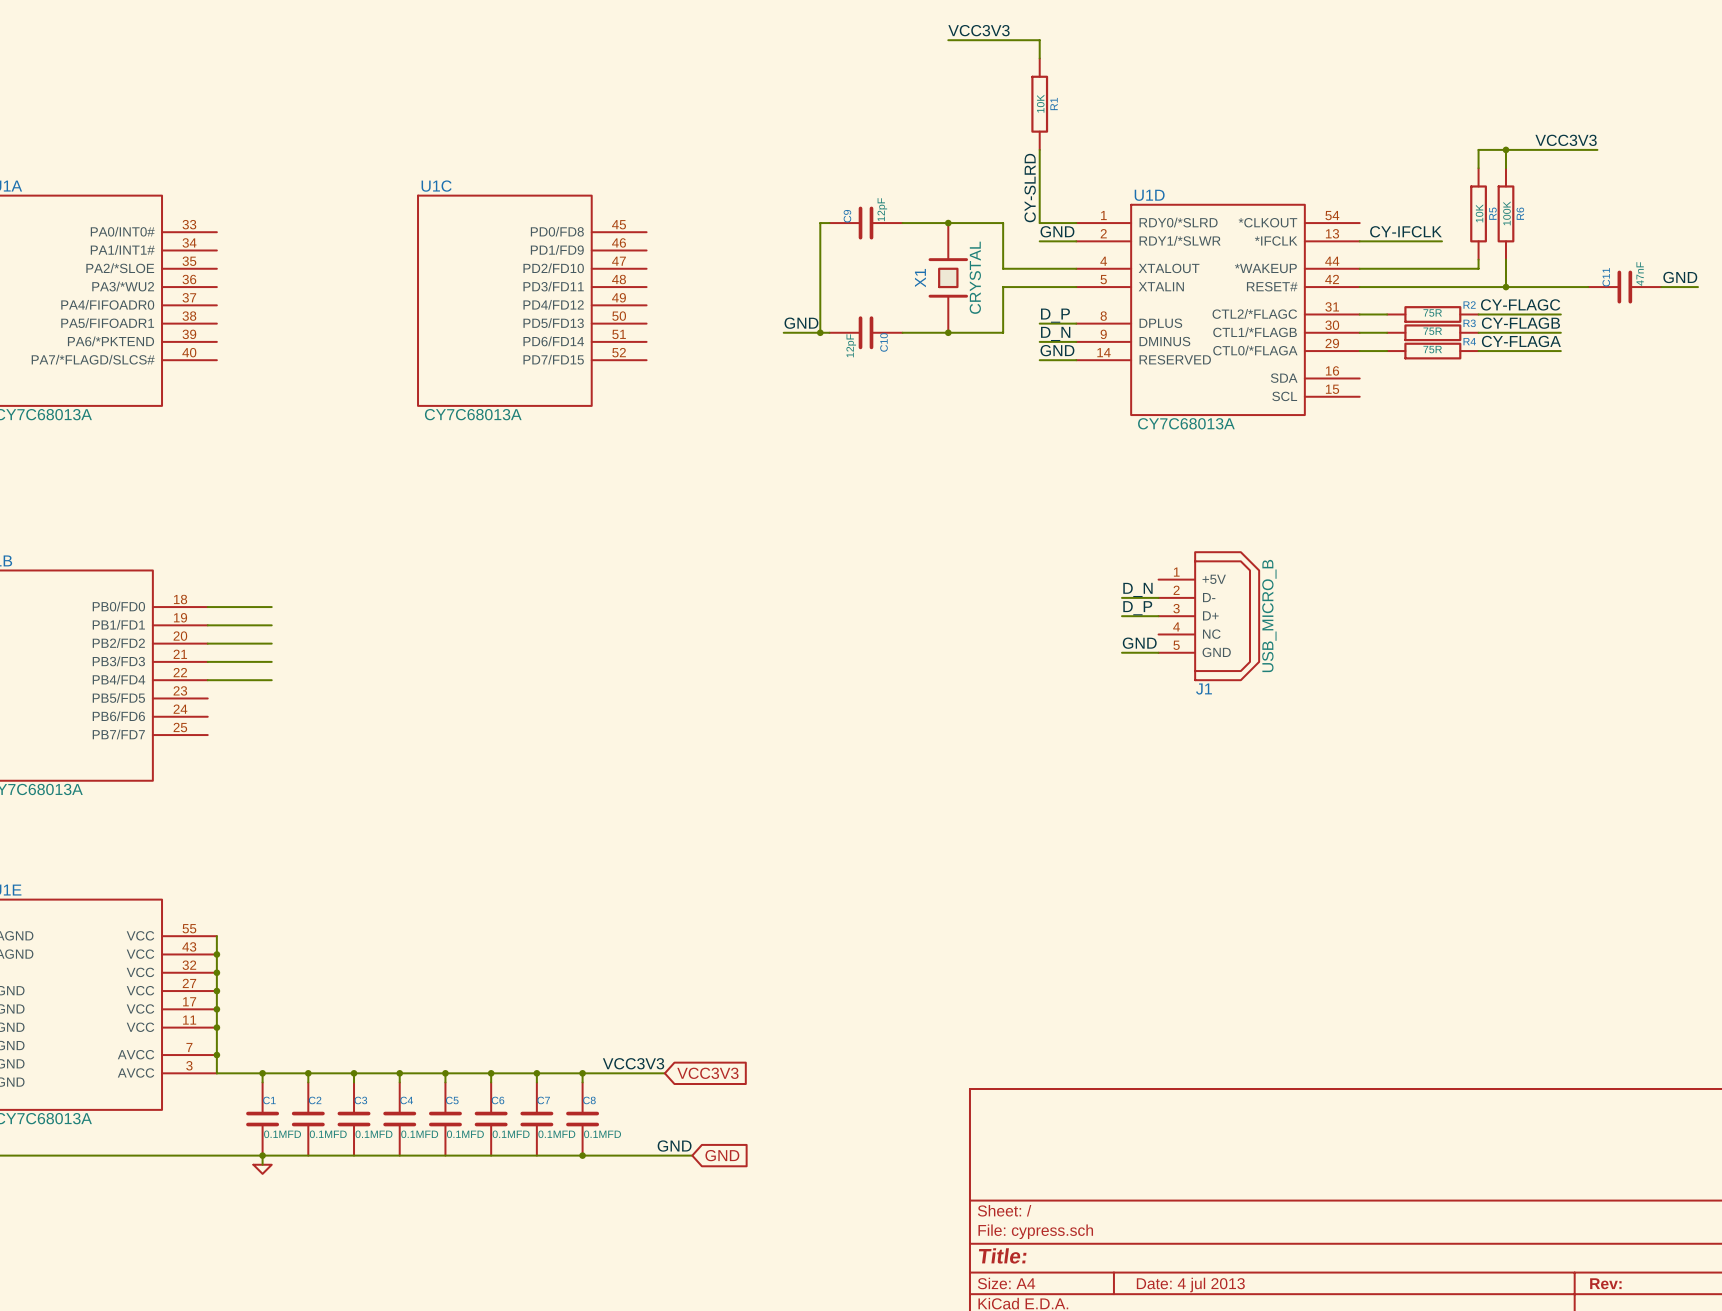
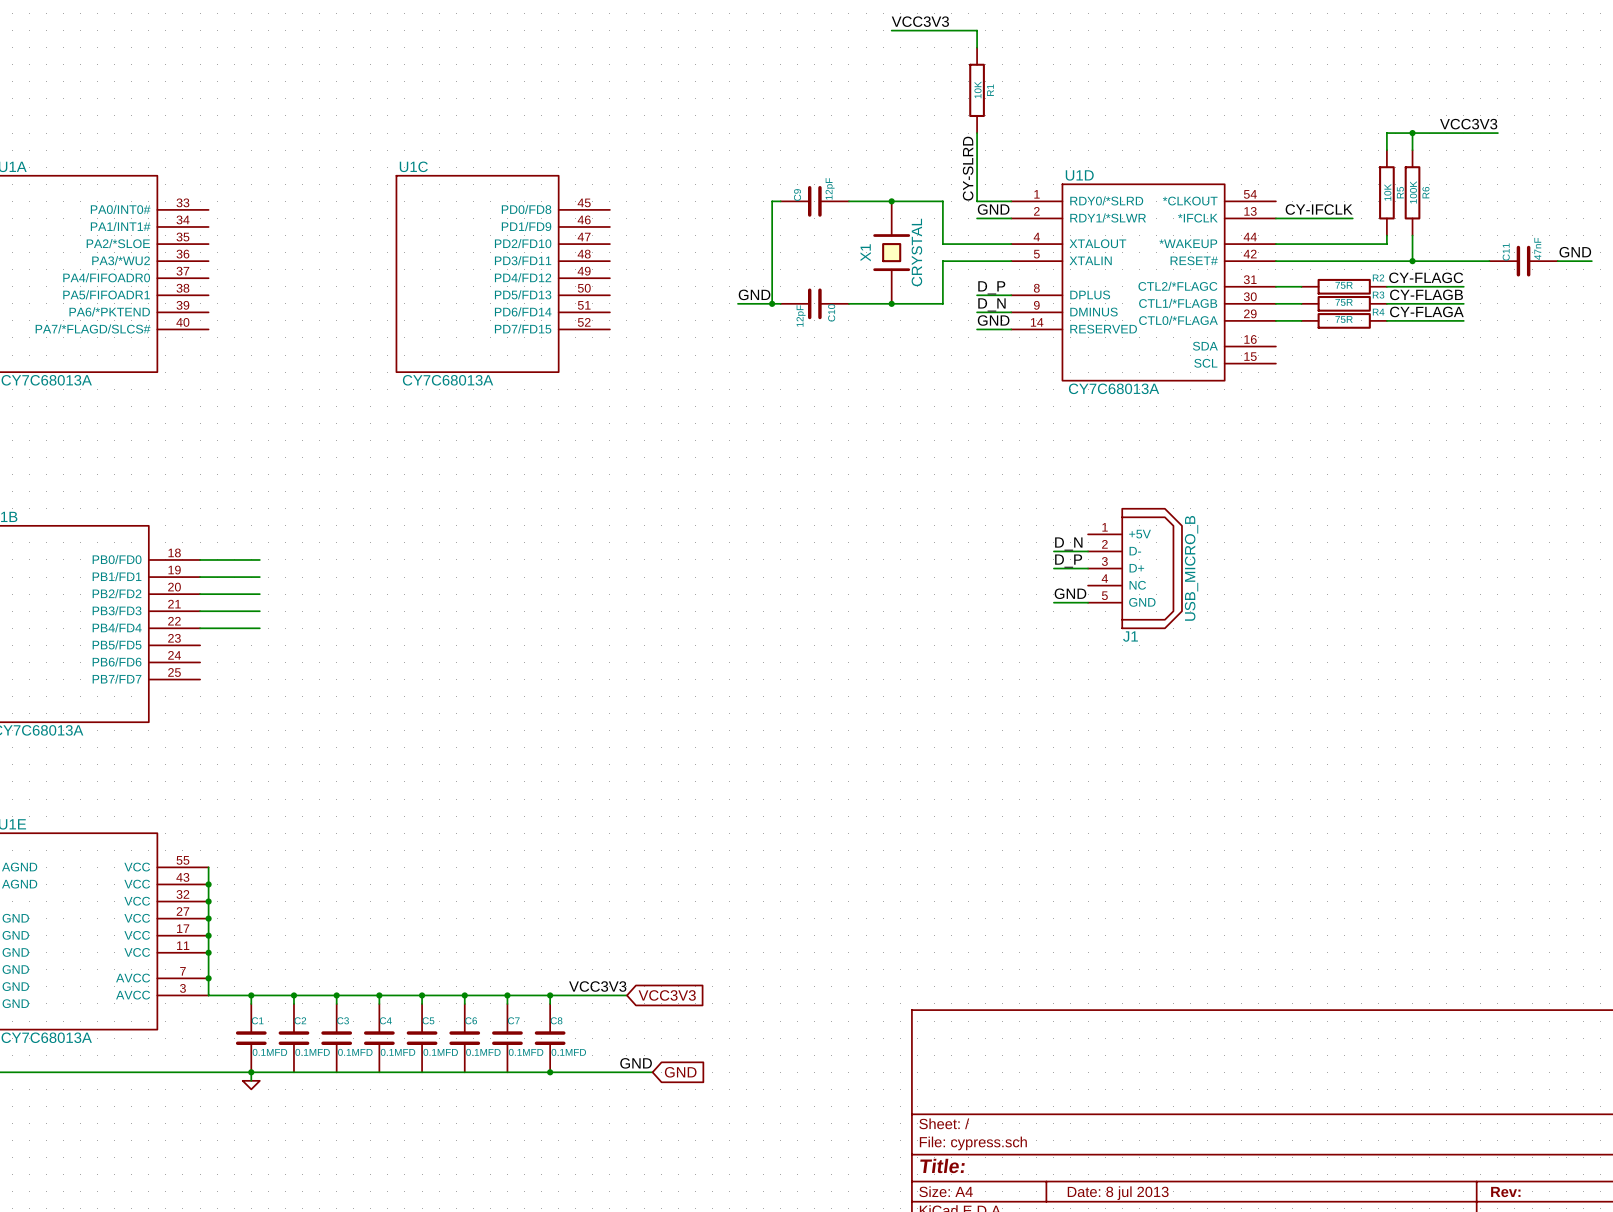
title block: Date: 4 jul 2013 (1190, 1285) -> Date: 8 jul 2013 (1118, 1193)

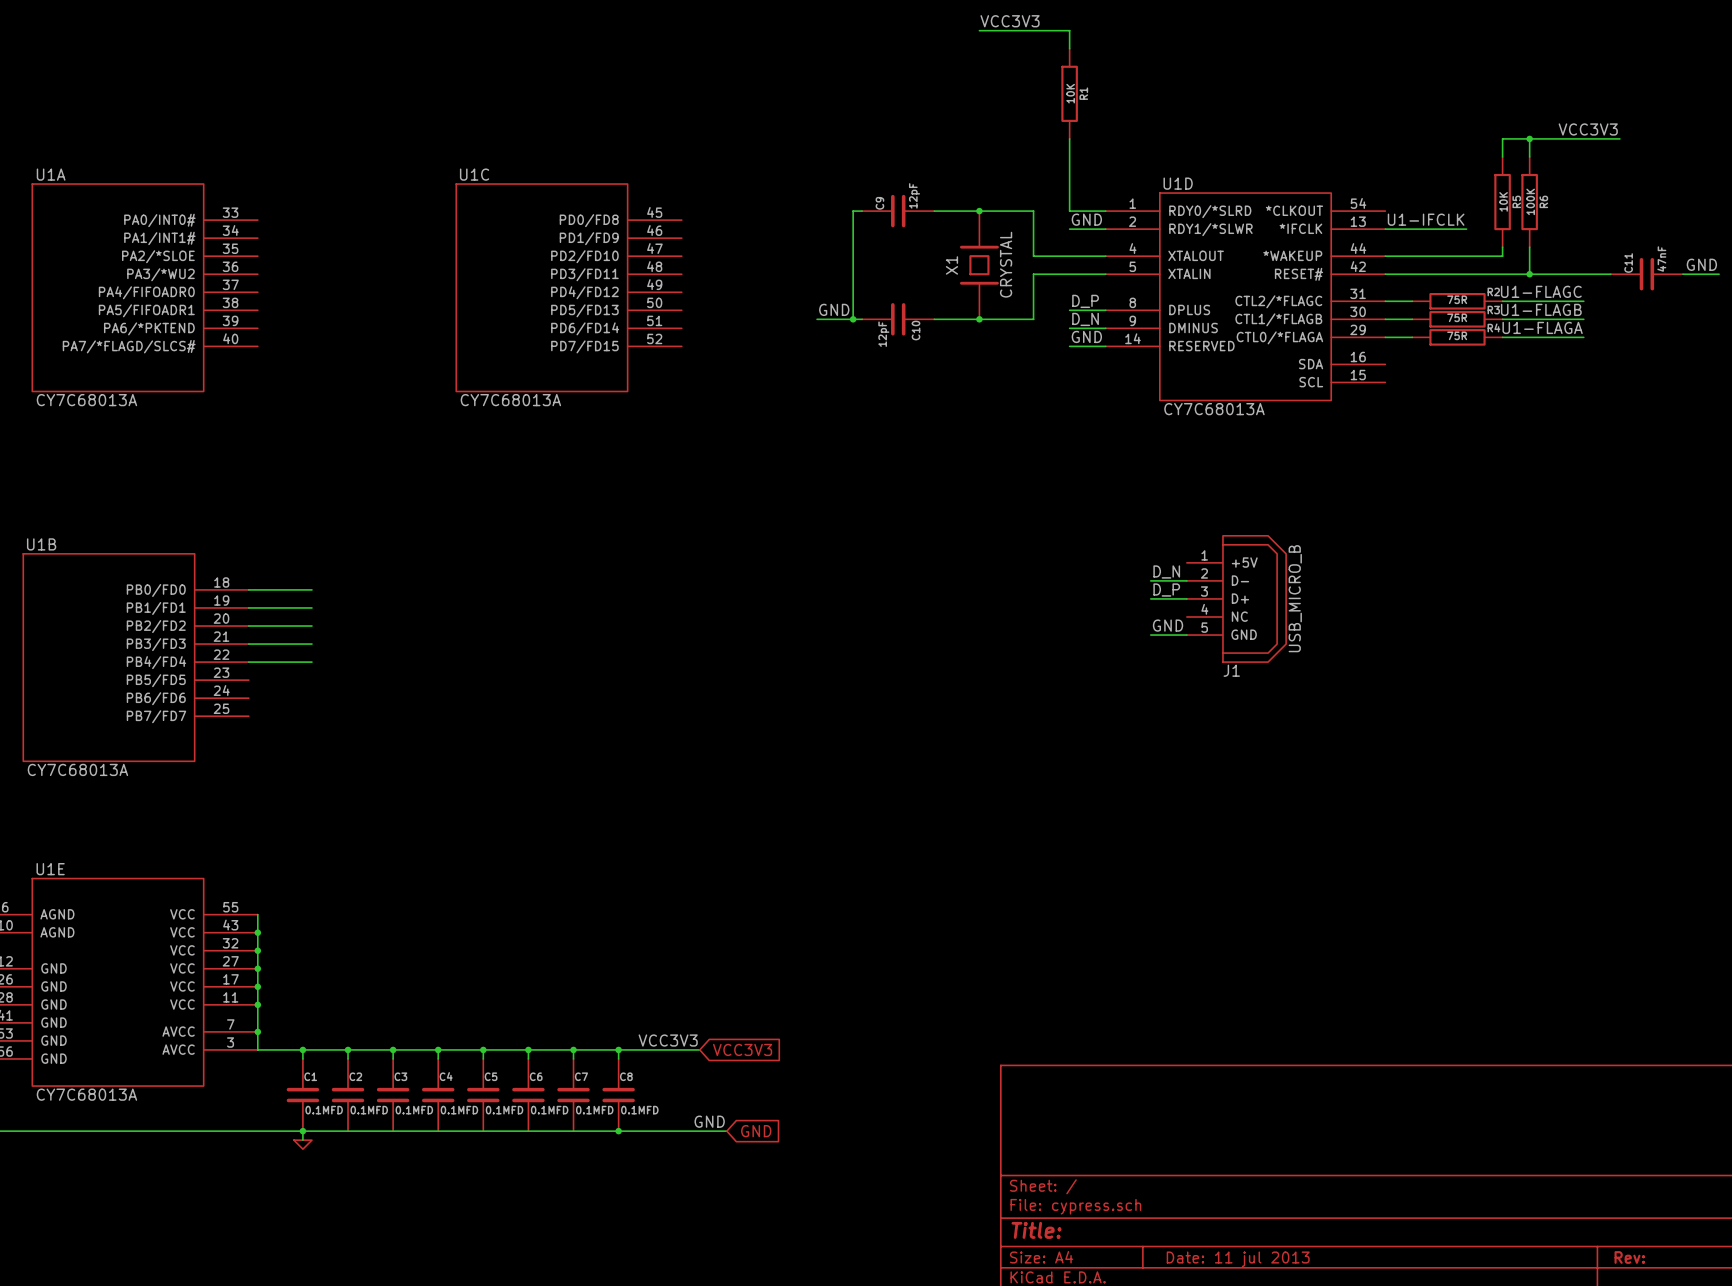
label: CY-SLRD (968, 168) -> none
label: CY-IFCLK (1319, 209) -> U1-IFCLK (1426, 219)
label: CY-FLAGC (1426, 277) -> U1-FLAGC (1541, 291)
label: CY-FLAGB (1426, 294) -> U1-FLAGB (1541, 309)
label: CY-FLAGA (1426, 311) -> U1-FLAGA (1542, 327)
title block: Date: 8 jul 2013 (1118, 1193) -> Date: 11 jul 2013 (1238, 1259)

